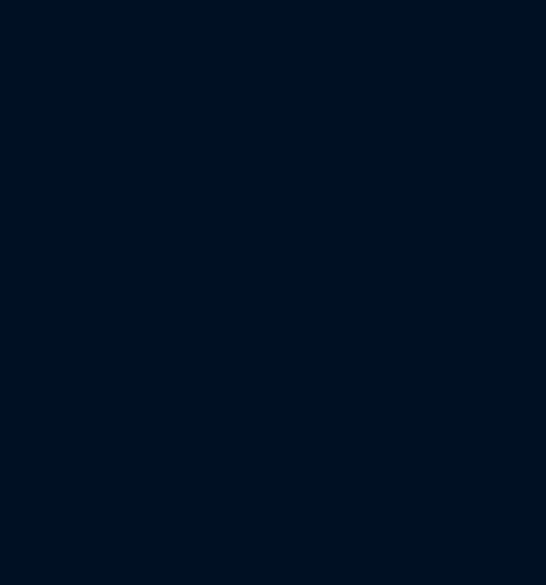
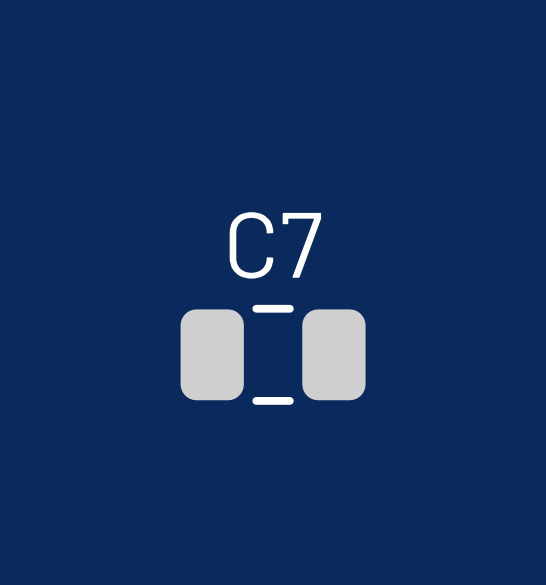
C7: none -> (273, 354)

